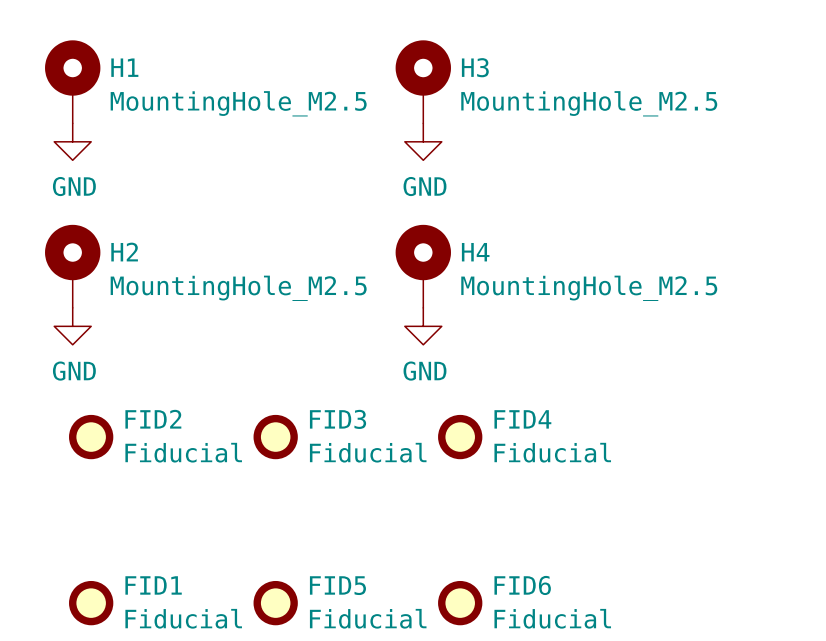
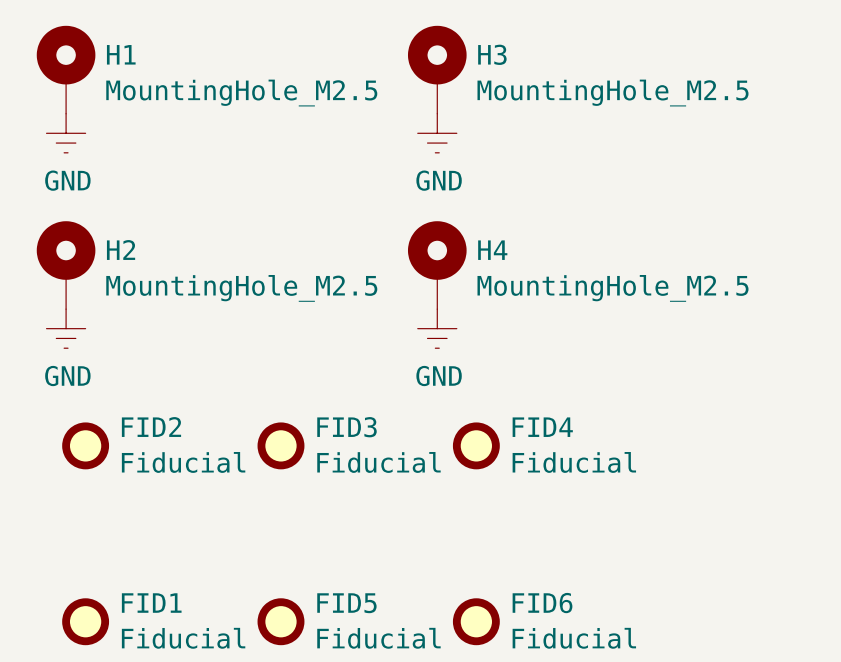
power symbol shape: [54, 123, 92, 161] -> [46, 113, 86, 153]
power symbol shape: [404, 123, 442, 161] -> [417, 113, 457, 153]
power symbol shape: [54, 307, 92, 345] -> [46, 309, 86, 349]
power symbol shape: [404, 307, 442, 345] -> [417, 309, 457, 349]

